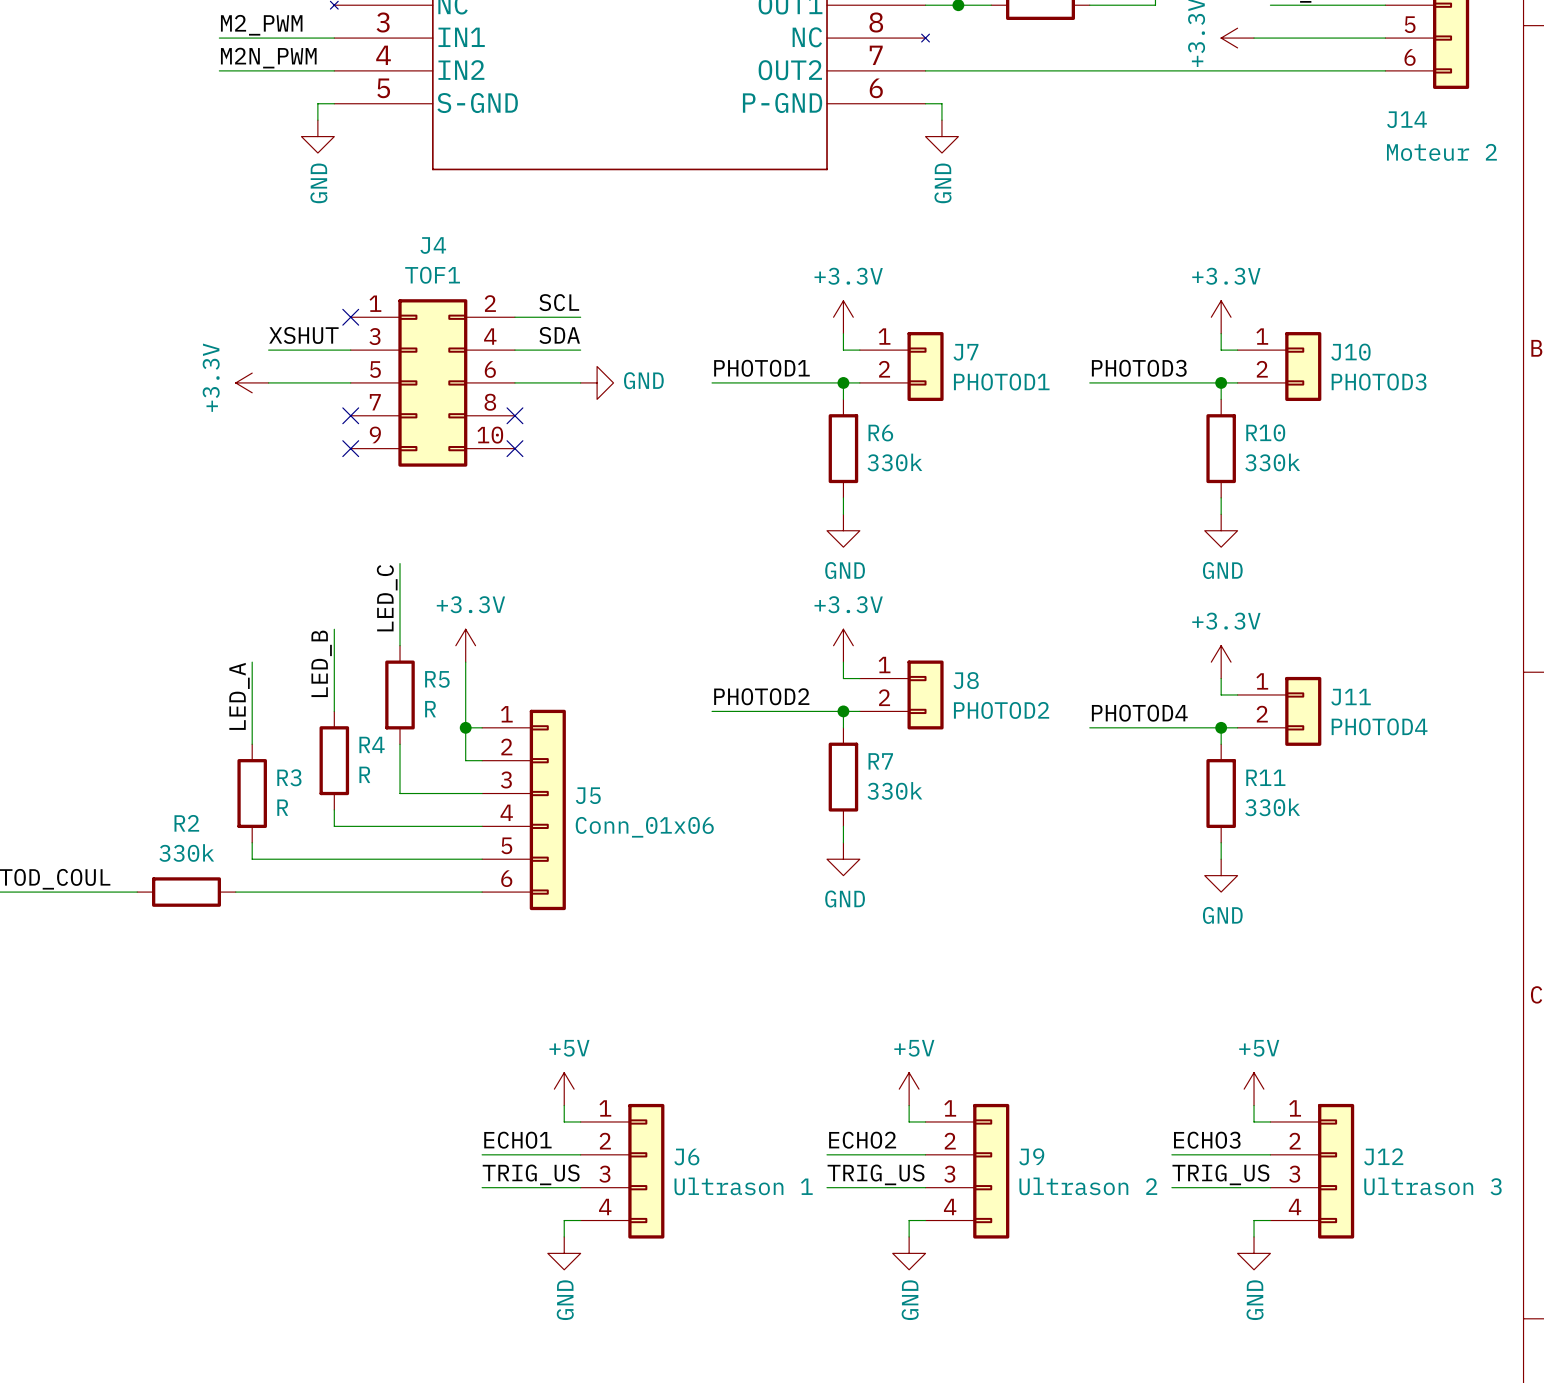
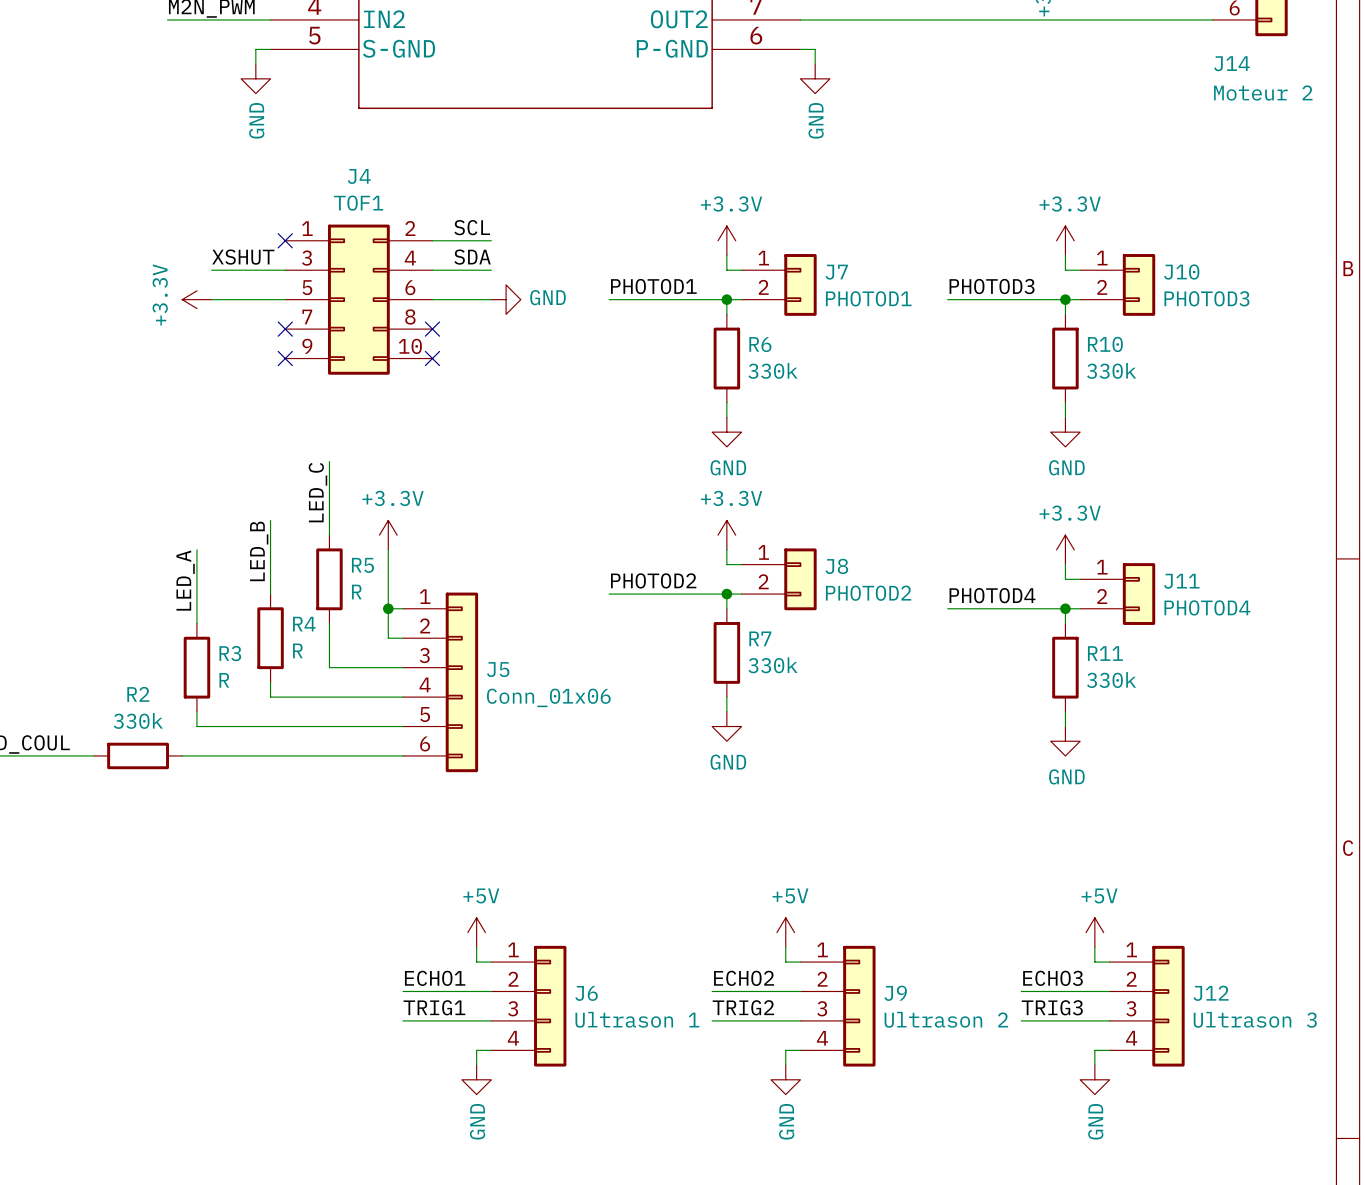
label: TRIG_US (531, 1174) -> TRIG1 (434, 1007)
label: TRIG_US (876, 1174) -> TRIG2 (743, 1007)
label: TRIG_US (1220, 1174) -> TRIG3 (1052, 1007)

